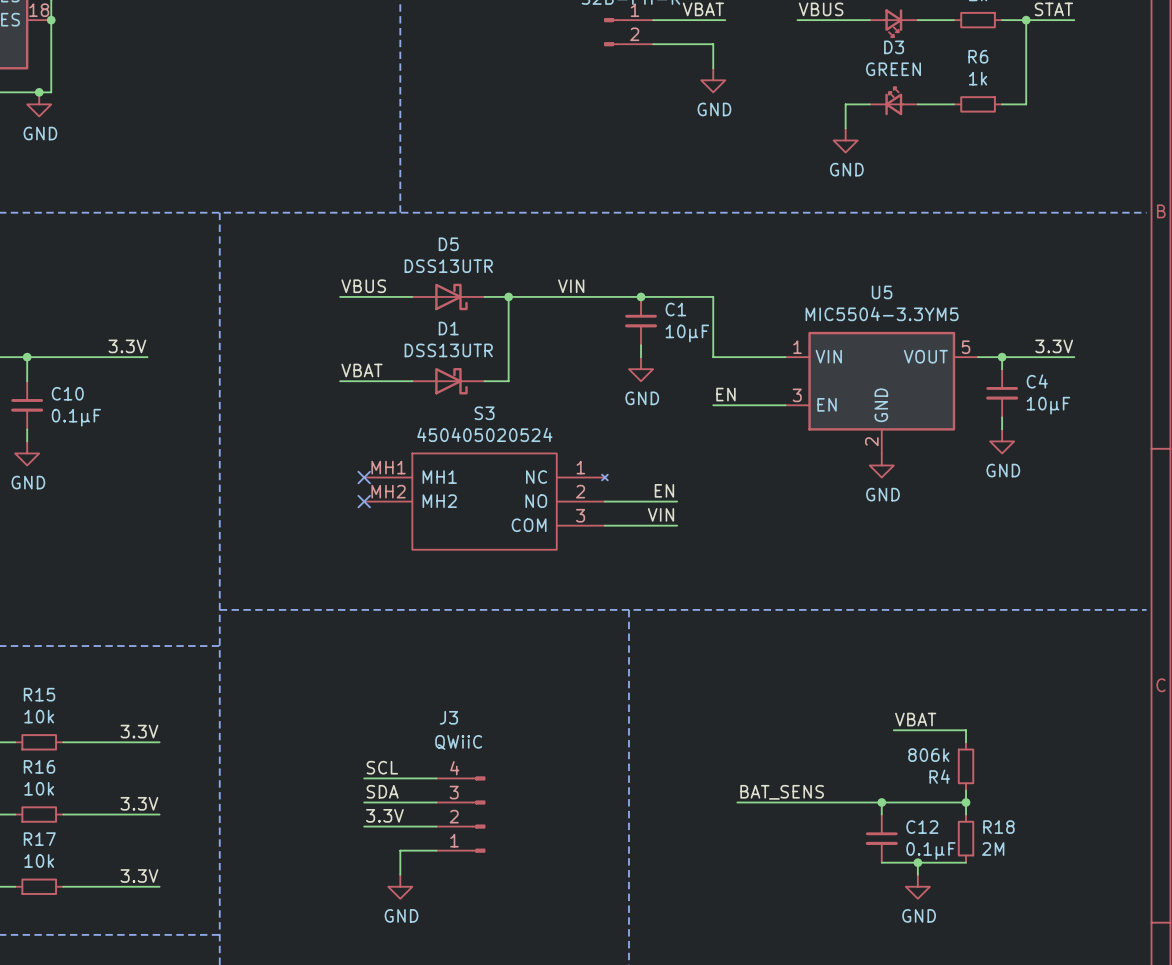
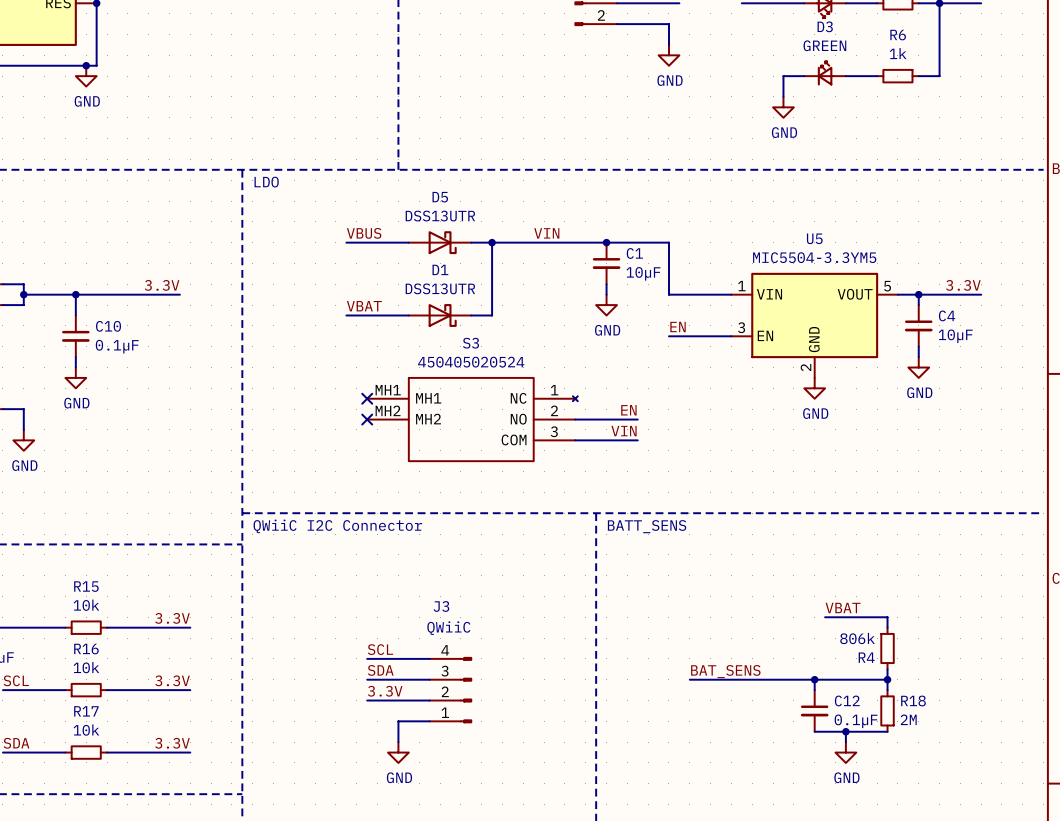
text: none -> LDO (266, 182)
text: none -> QWiiC I2C Connector (337, 526)
text: none -> BATT_SENS (647, 526)

